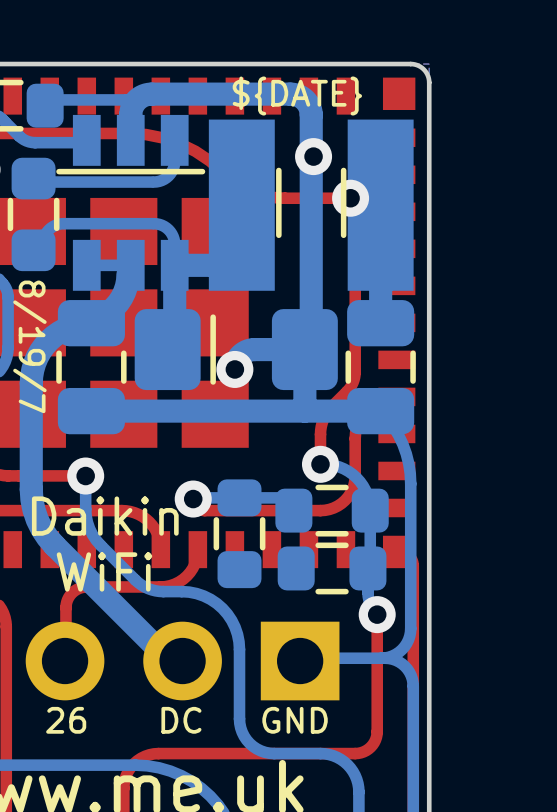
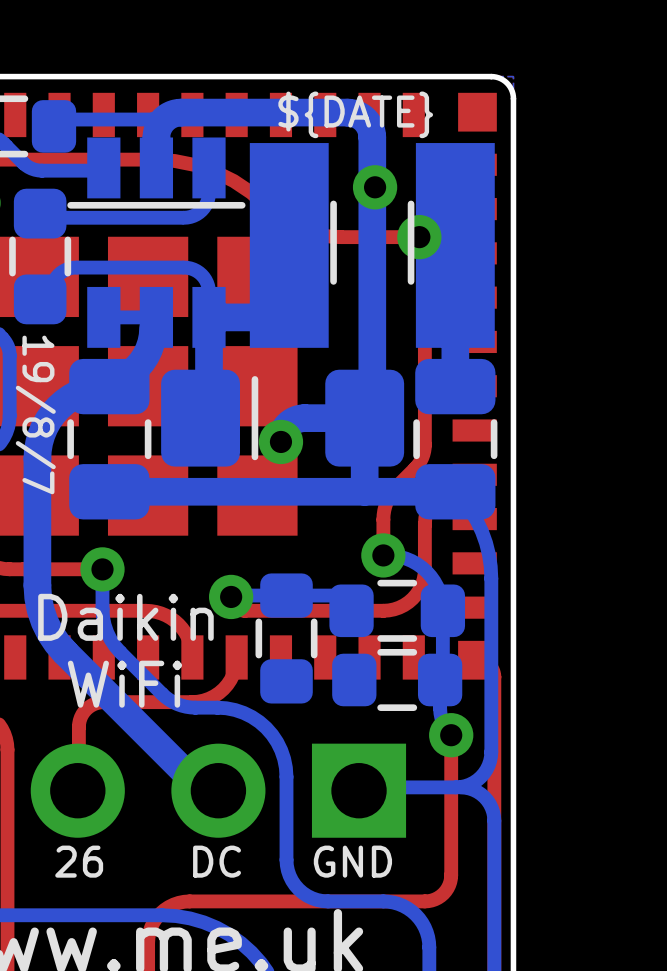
text: 8/19/7 (29, 346) -> 19/8/7 (35, 414)

